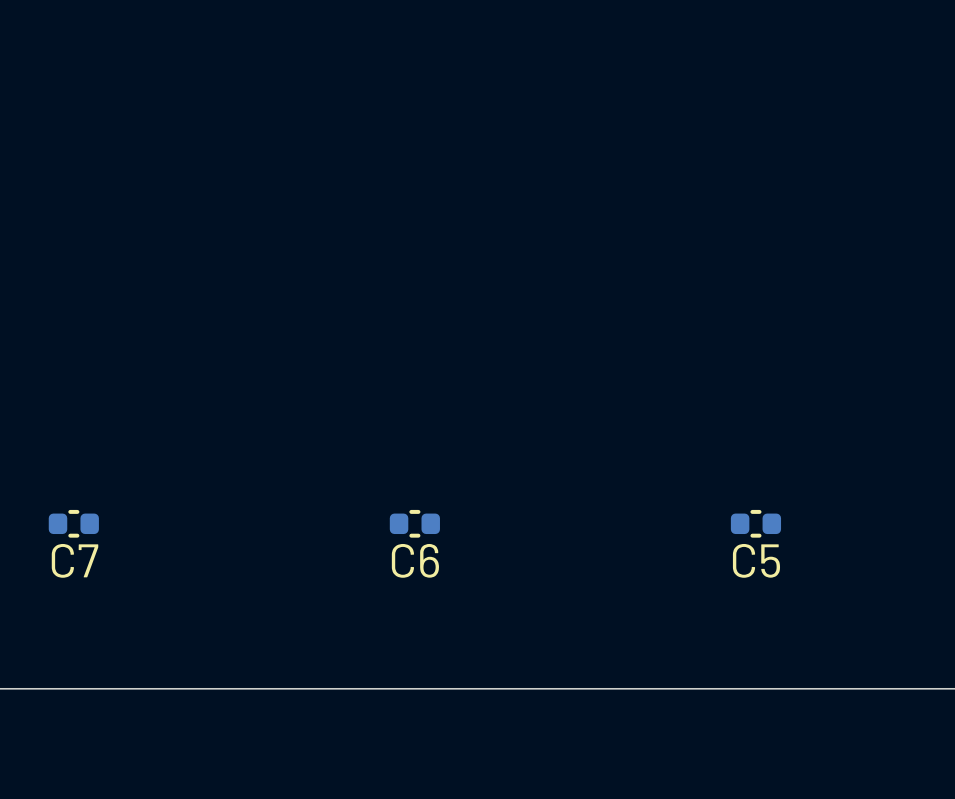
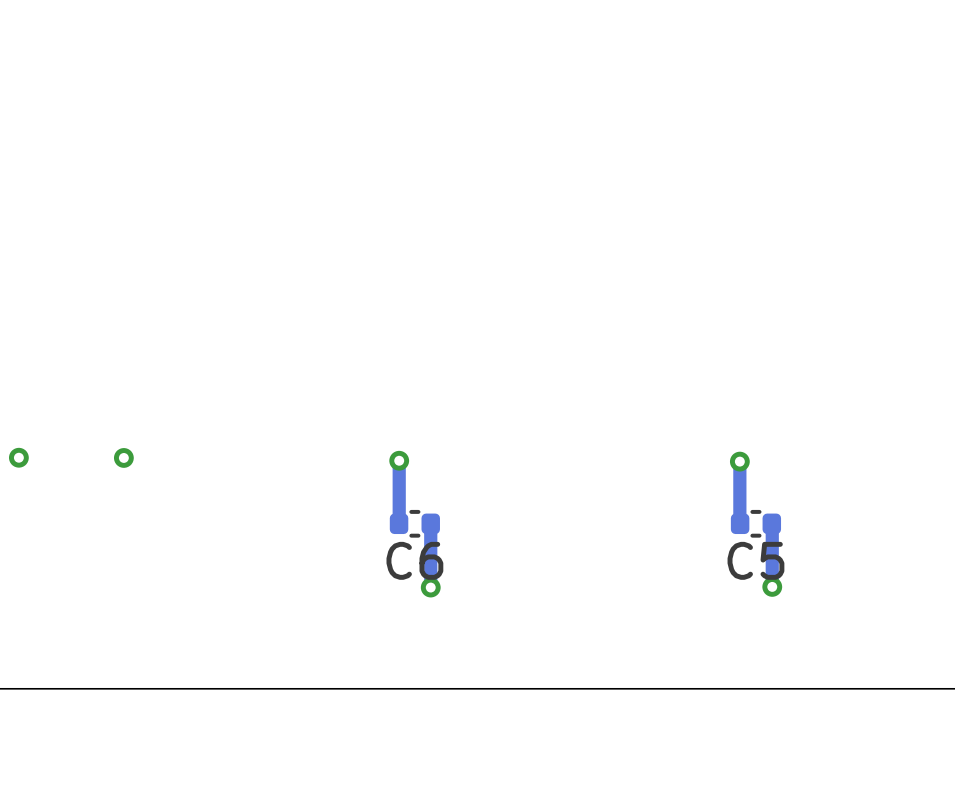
via: none -> (18, 457)
via: none -> (123, 457)
track: none -> (399, 460) (399, 523)
via: none -> (399, 460)
track: none -> (739, 461) (739, 523)
via: none -> (739, 461)
C7: (73, 523) -> none
track: none -> (430, 523) (430, 587)
track: none -> (772, 524) (772, 586)
via: none -> (772, 586)
via: none -> (430, 587)

